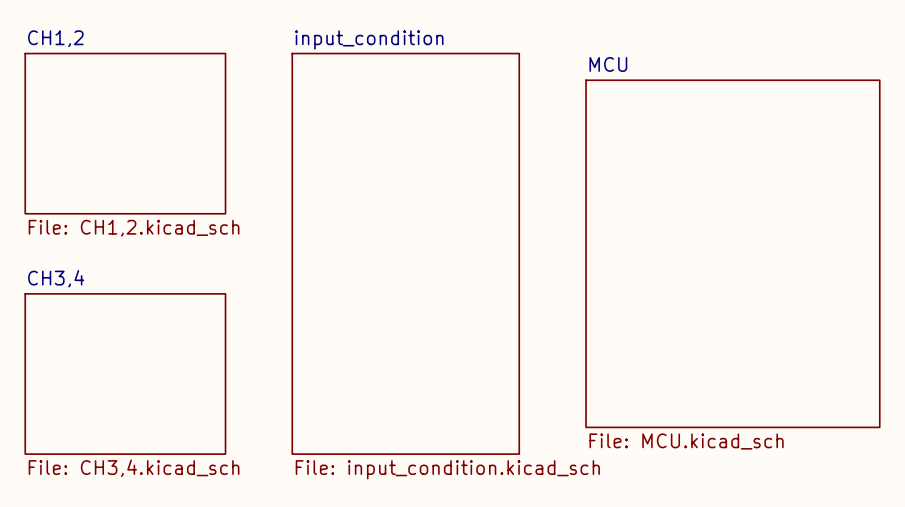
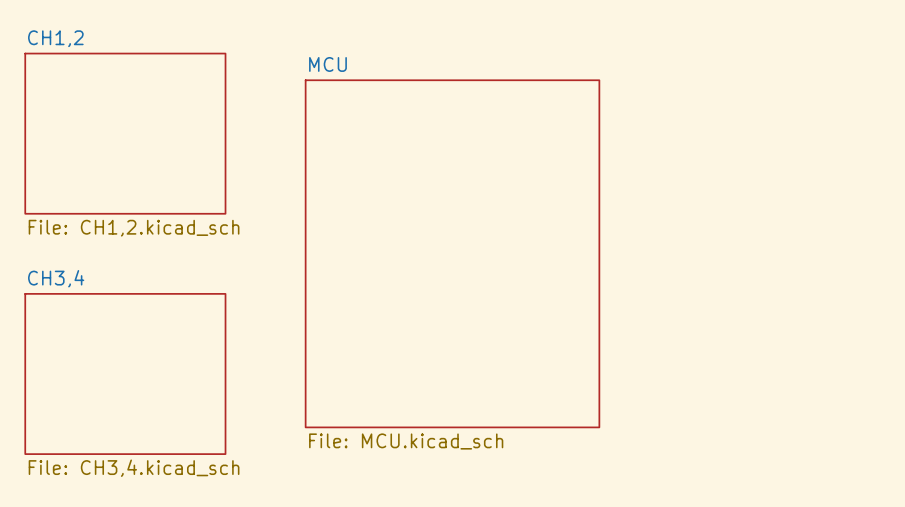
sheet input_condition: File: input_condition.kicad_sch (405, 253) -> none
sheet MCU: none -> File: MCU.kicad_sch (452, 253)
sheet MCU: File: MCU.kicad_sch (732, 253) -> none

